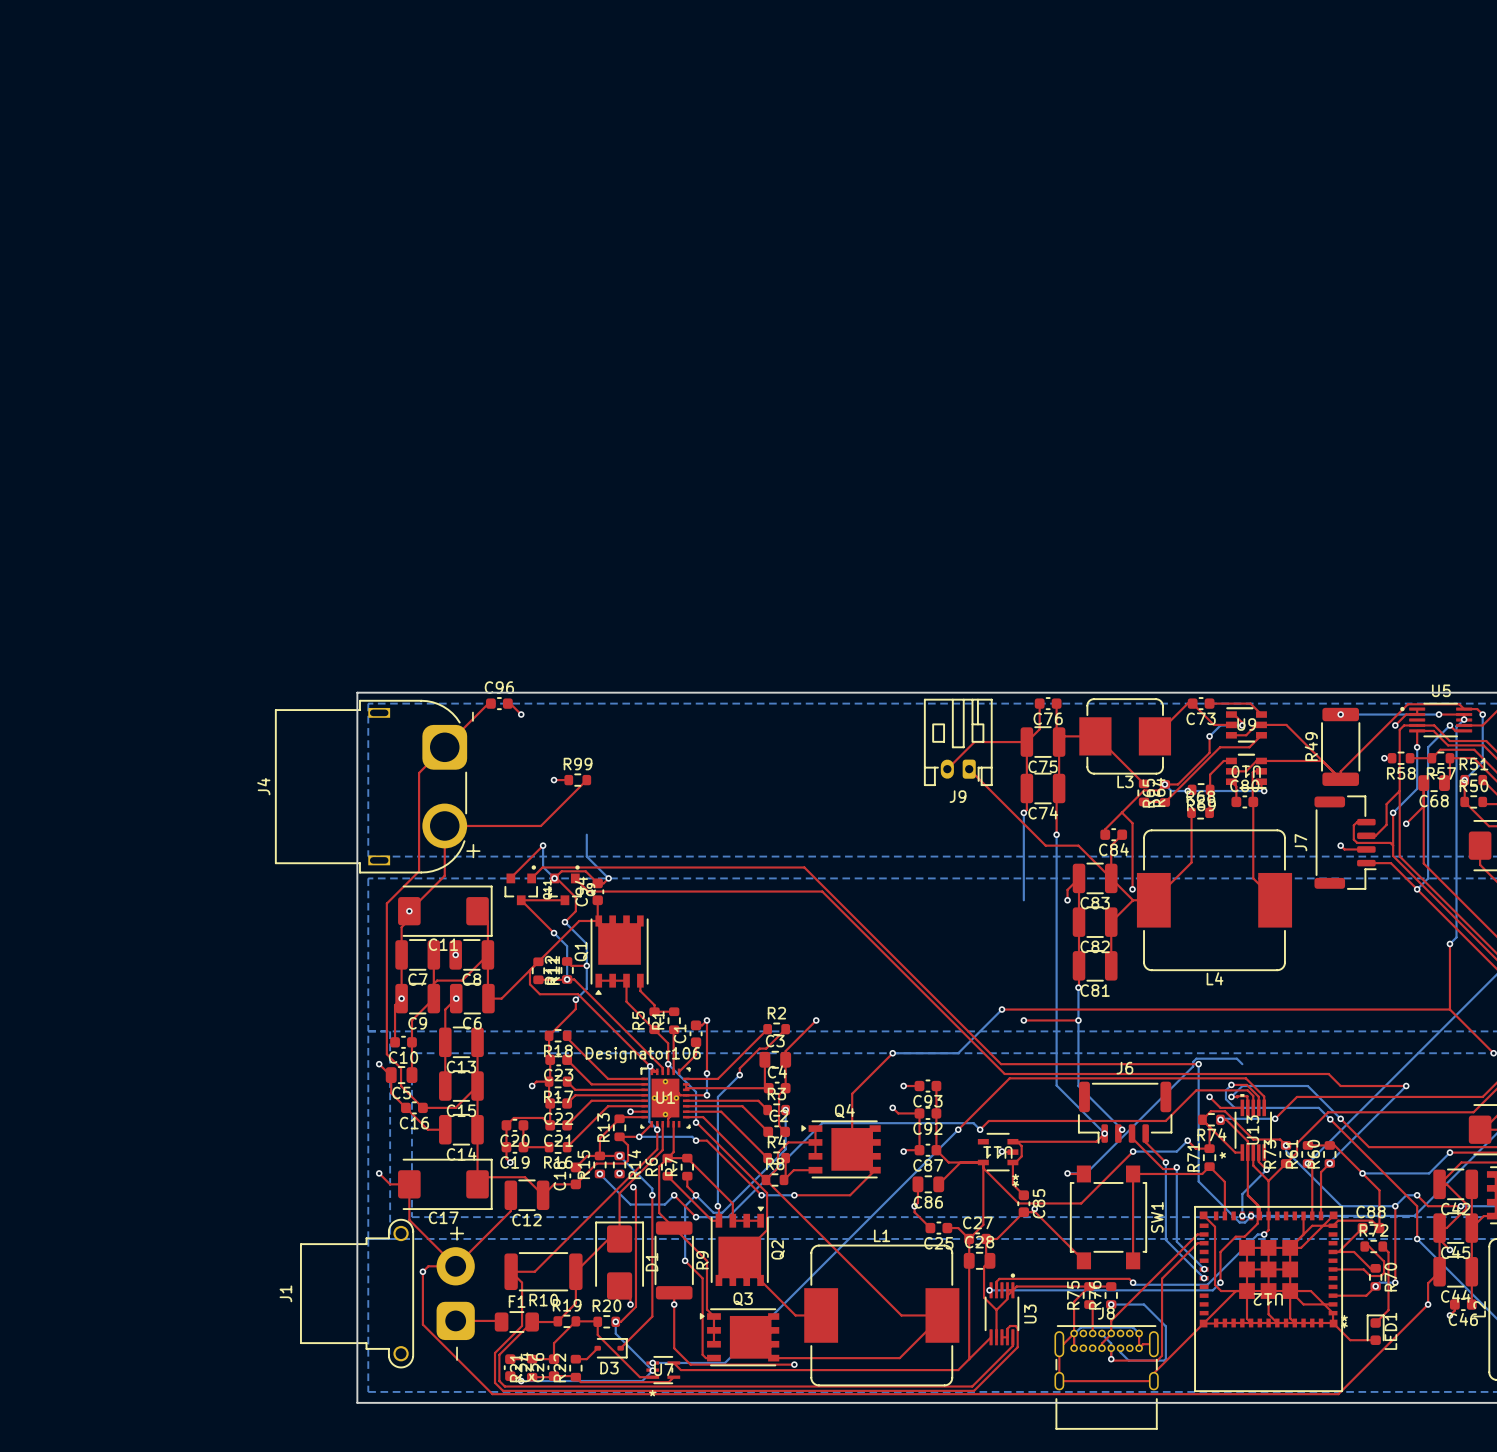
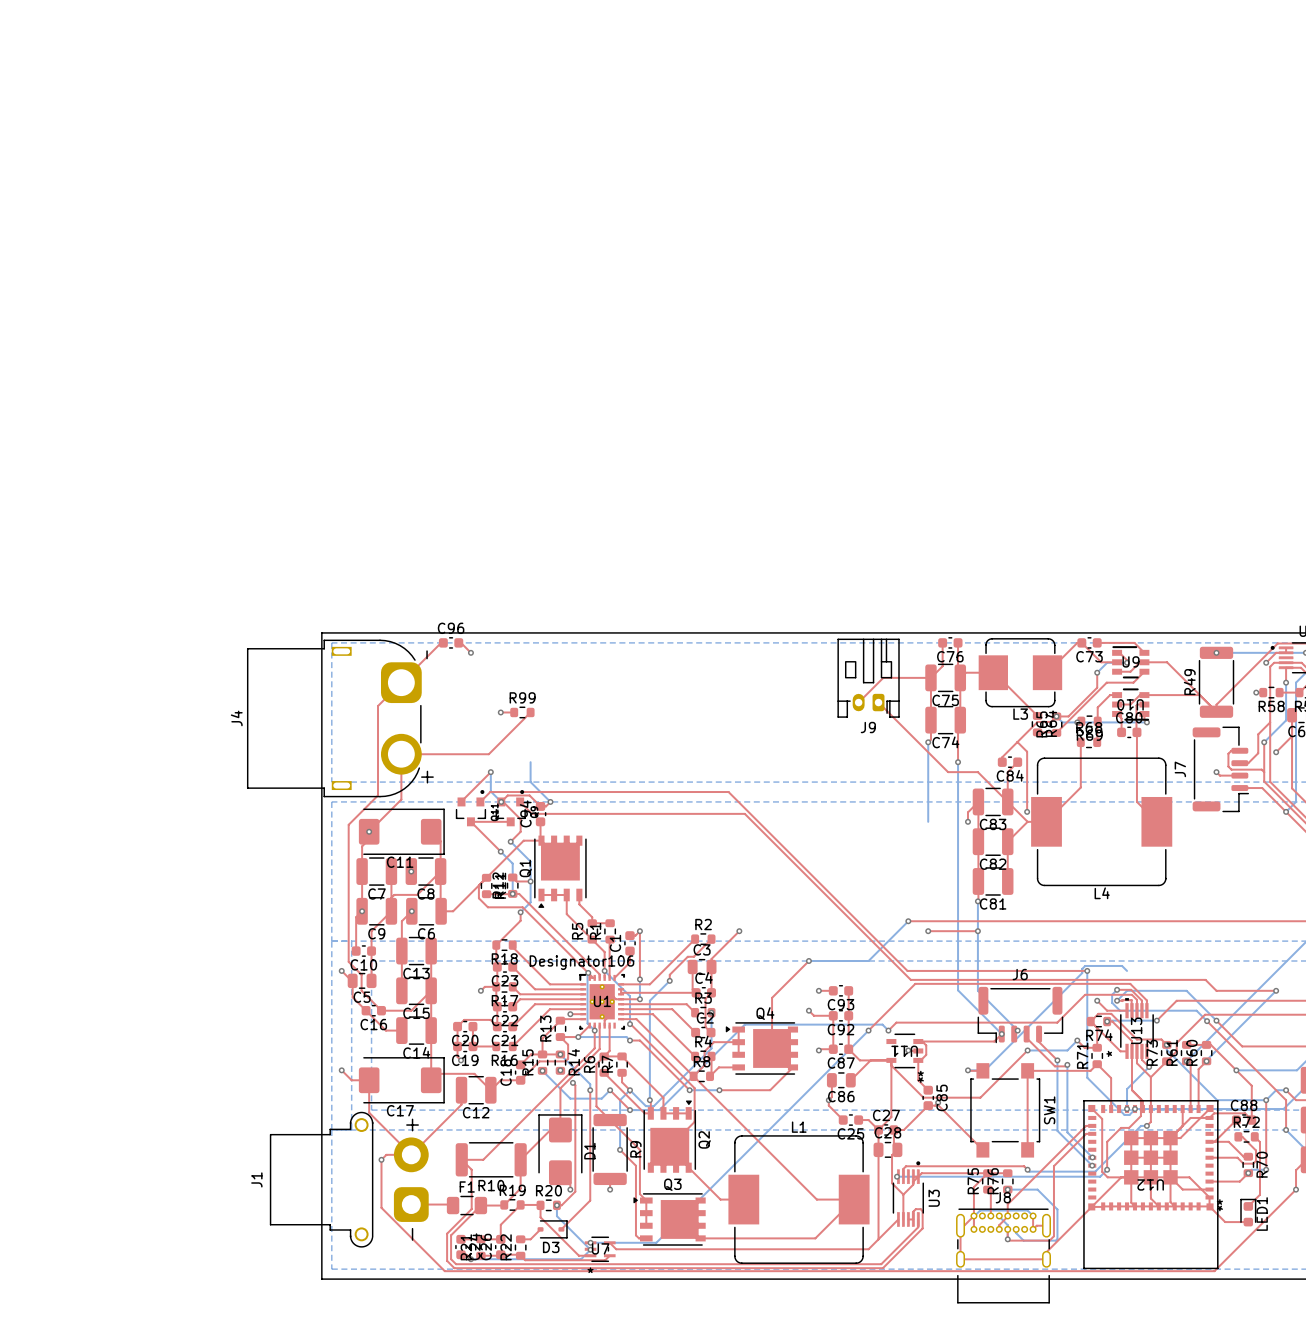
top track: (674, 1304) (674, 1348) (690, 1364) (794, 1364) -> none
via: (794, 1364) -> none

